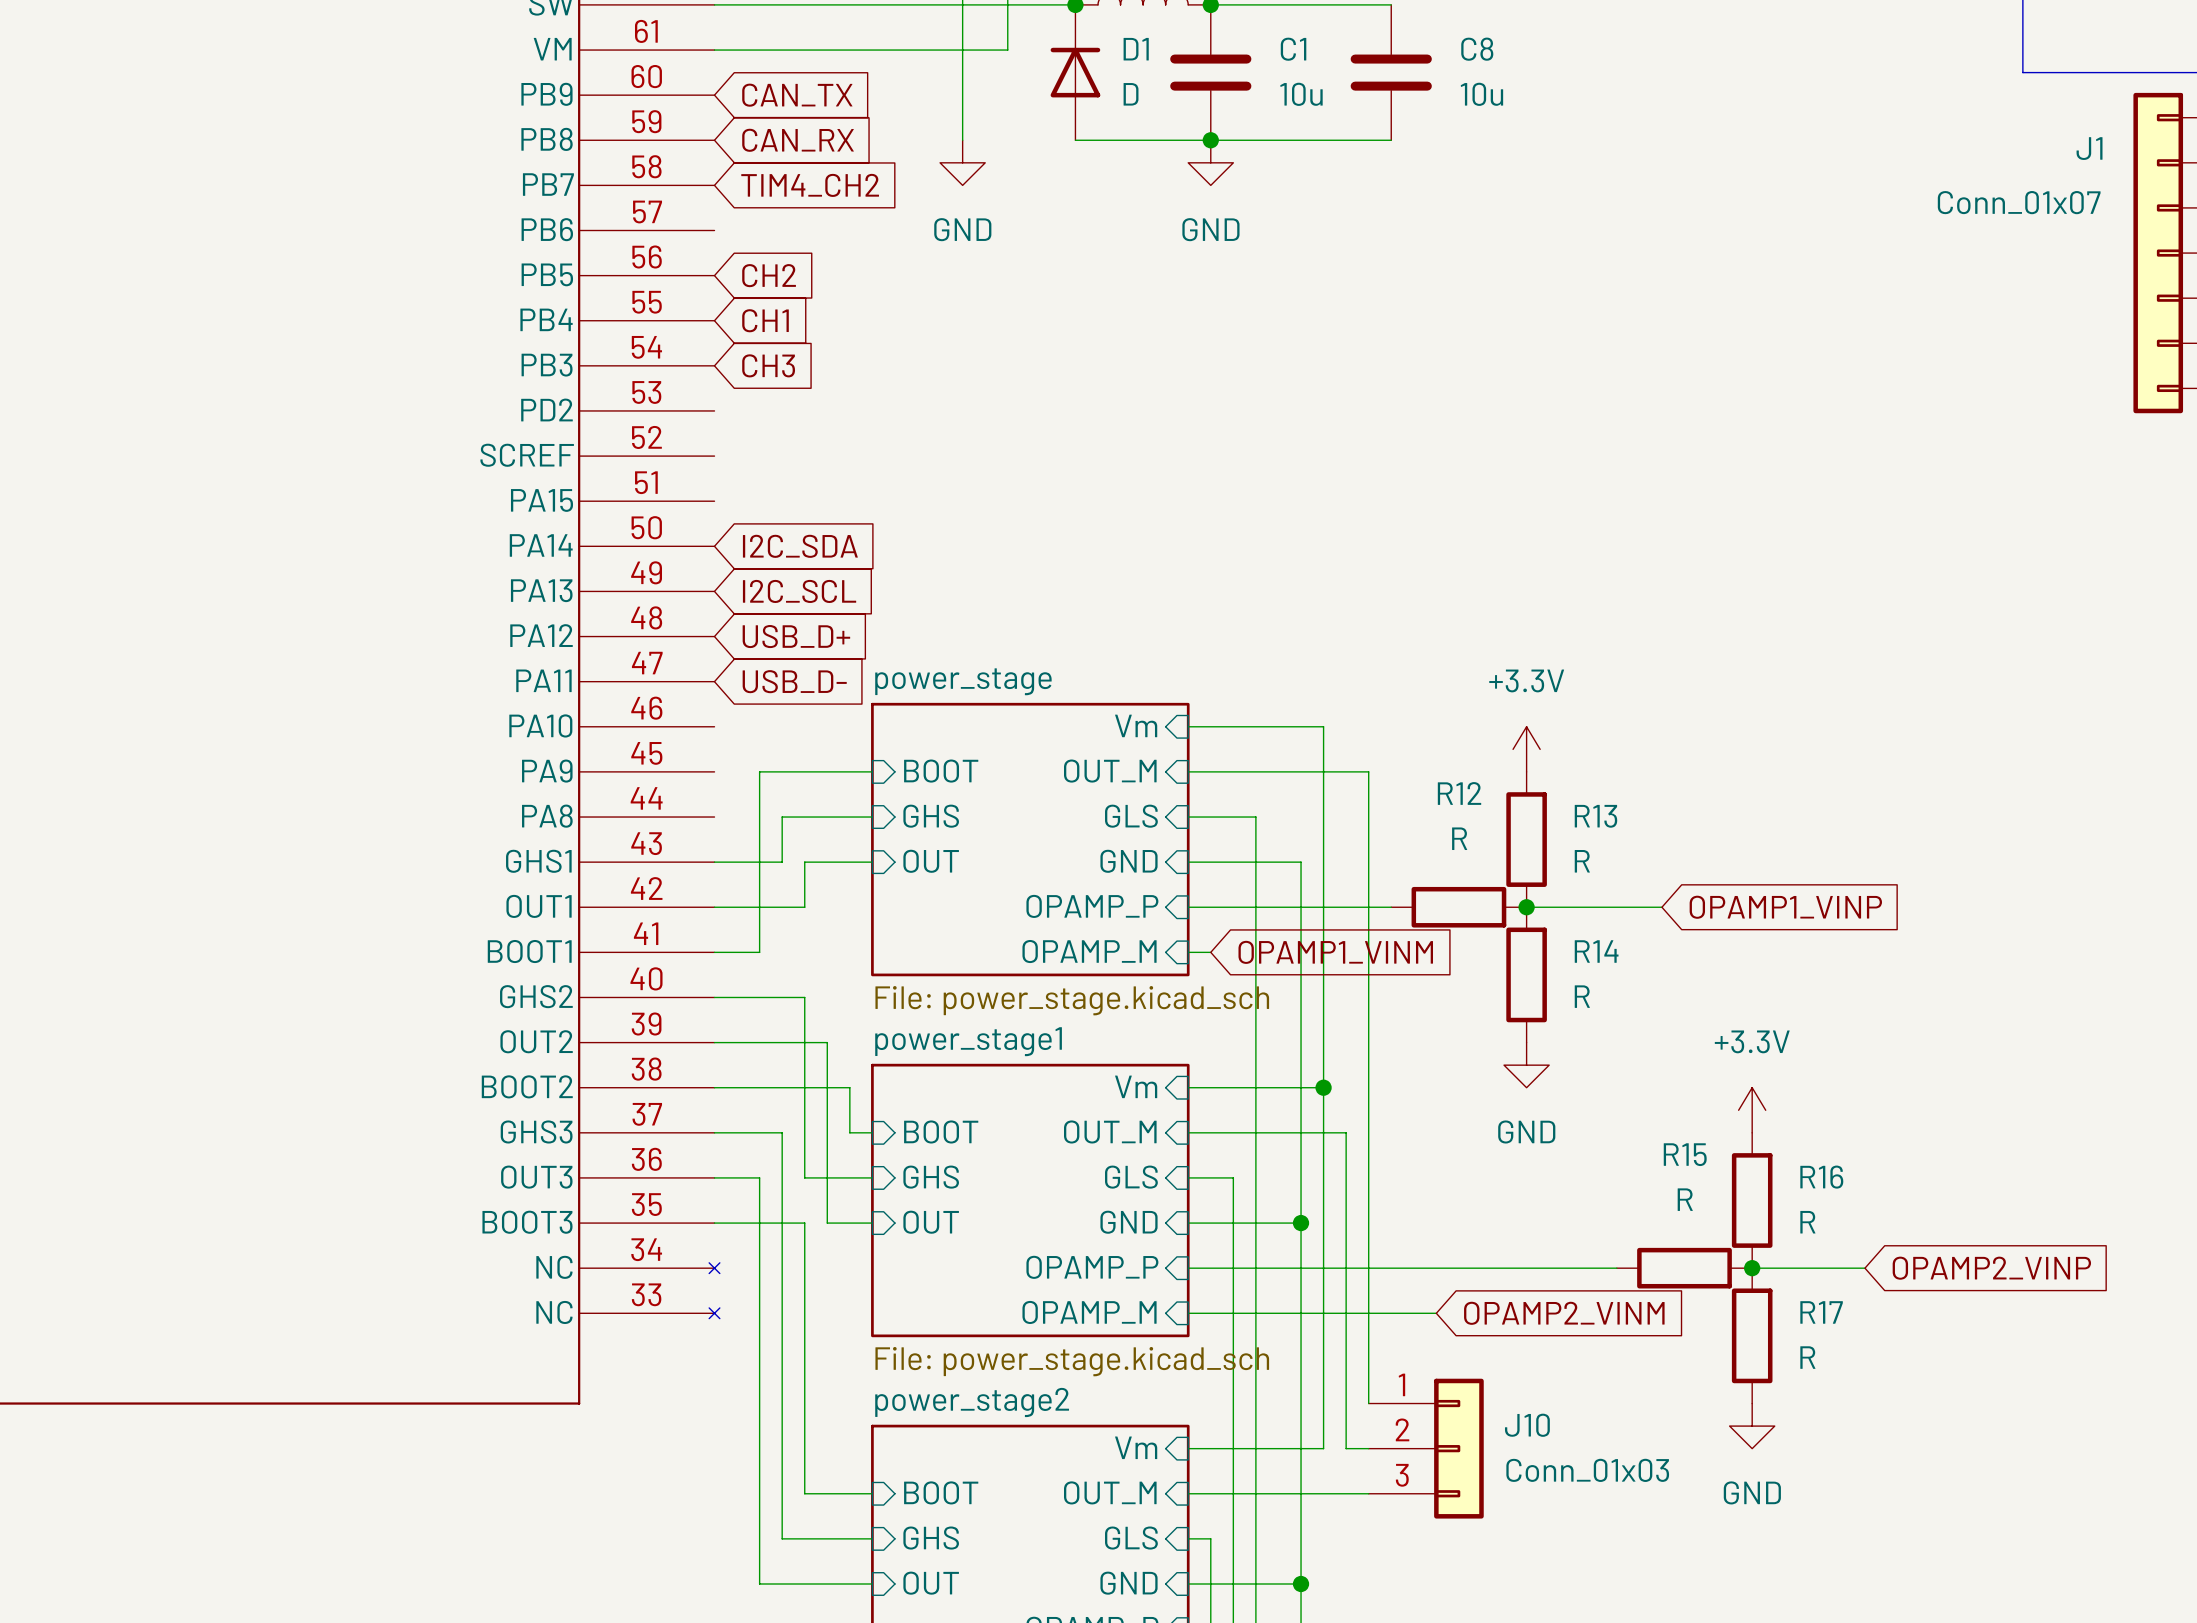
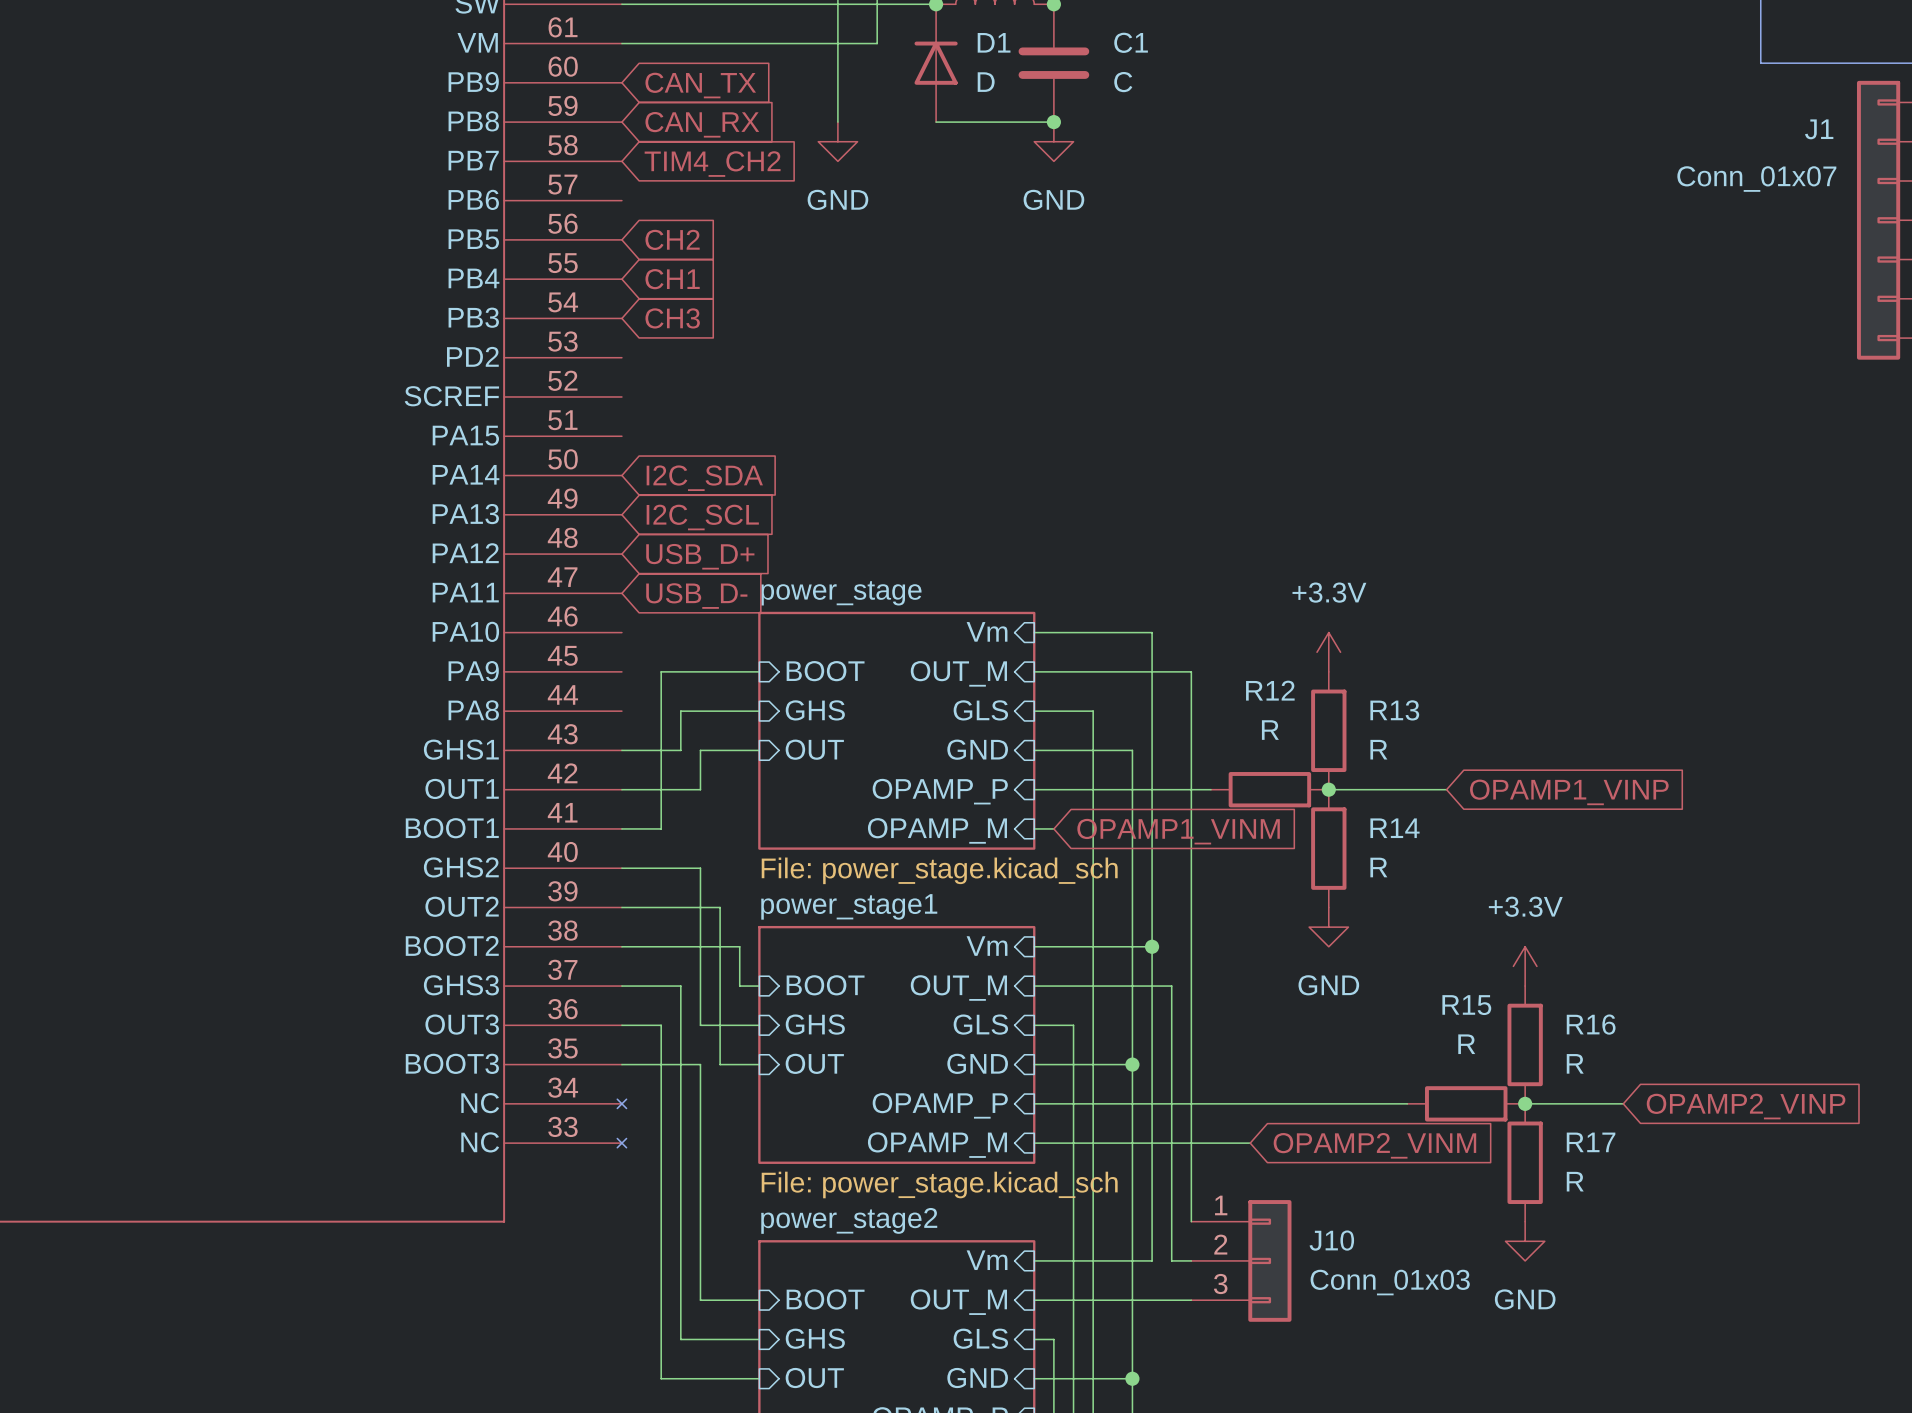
wire: (1210, 4) (1391, 4) -> none
C8: 10u (1391, 72) -> none
C1 value: 10u (1301, 94) -> C (1123, 82)
wire: (1210, 140) (1391, 140) -> none

